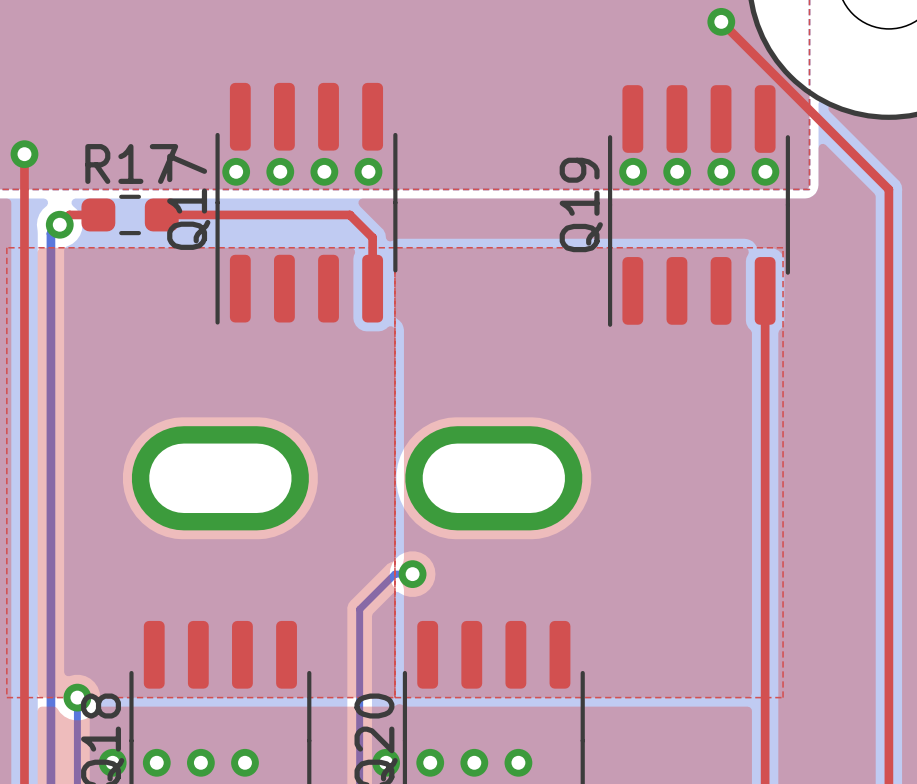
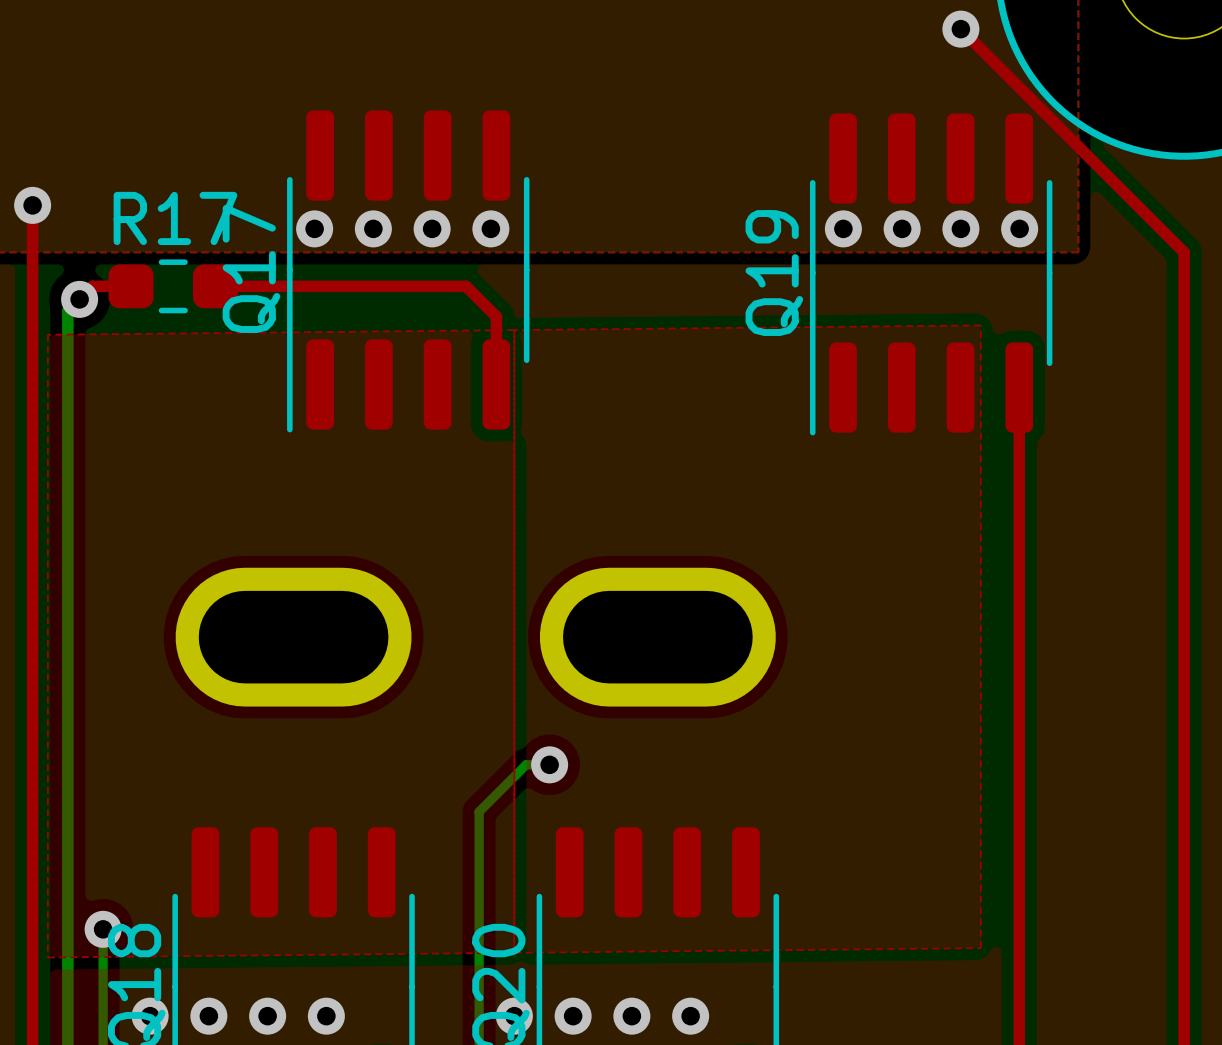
top zone outline: (6, 247) (783, 247) (783, 697) (6, 697) (6, 247) -> (980, 325) (47, 334) (47, 957) (980, 948) (980, 325)
top zone outline: none -> (514, 330) (514, 952)
top zone outline: (394, 247) (394, 697) -> none

